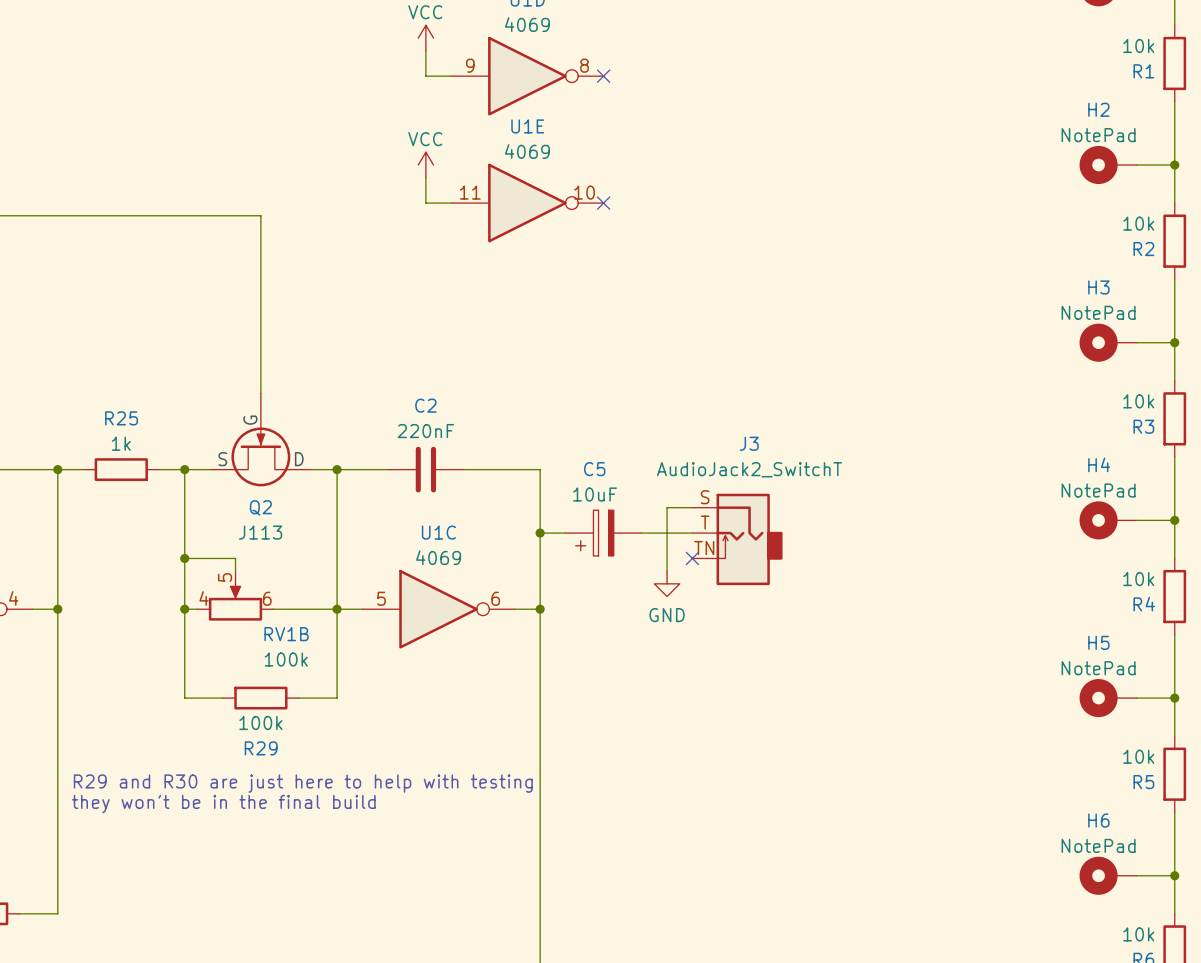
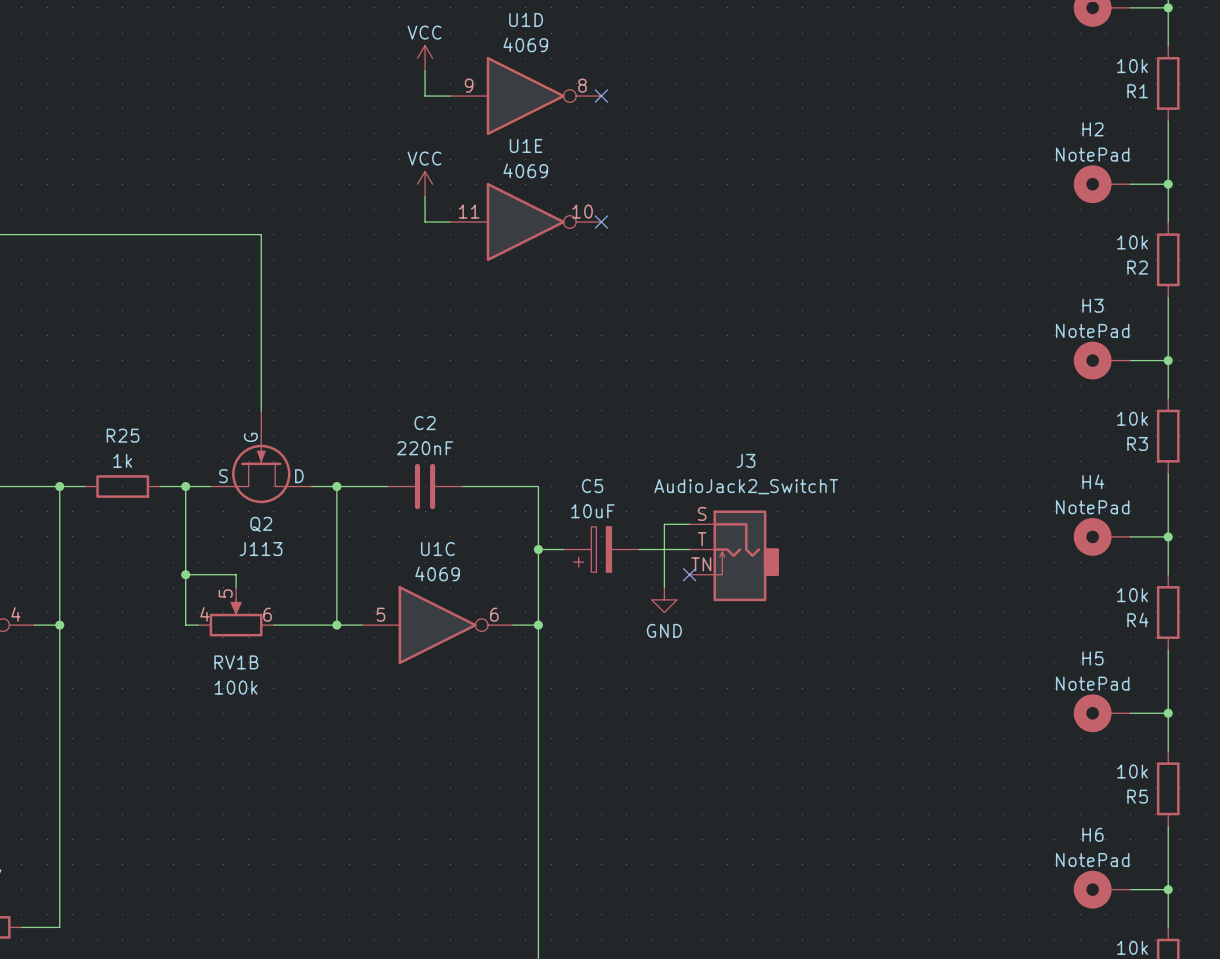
wire: (184, 609) (184, 698) (222, 698) -> none
junction: (184, 609) -> none
wire: (337, 609) (337, 698) (298, 698) -> none
RV1B name position: RV1B (286, 634) -> RV1B (236, 662)
RV1B value position: 100k (286, 659) -> 100k (236, 687)
R29: 100k (260, 698) -> none
text: R29 and R30 are just here to help with testing (303, 783) -> none
text: they won't be in the final build (223, 804) -> none

